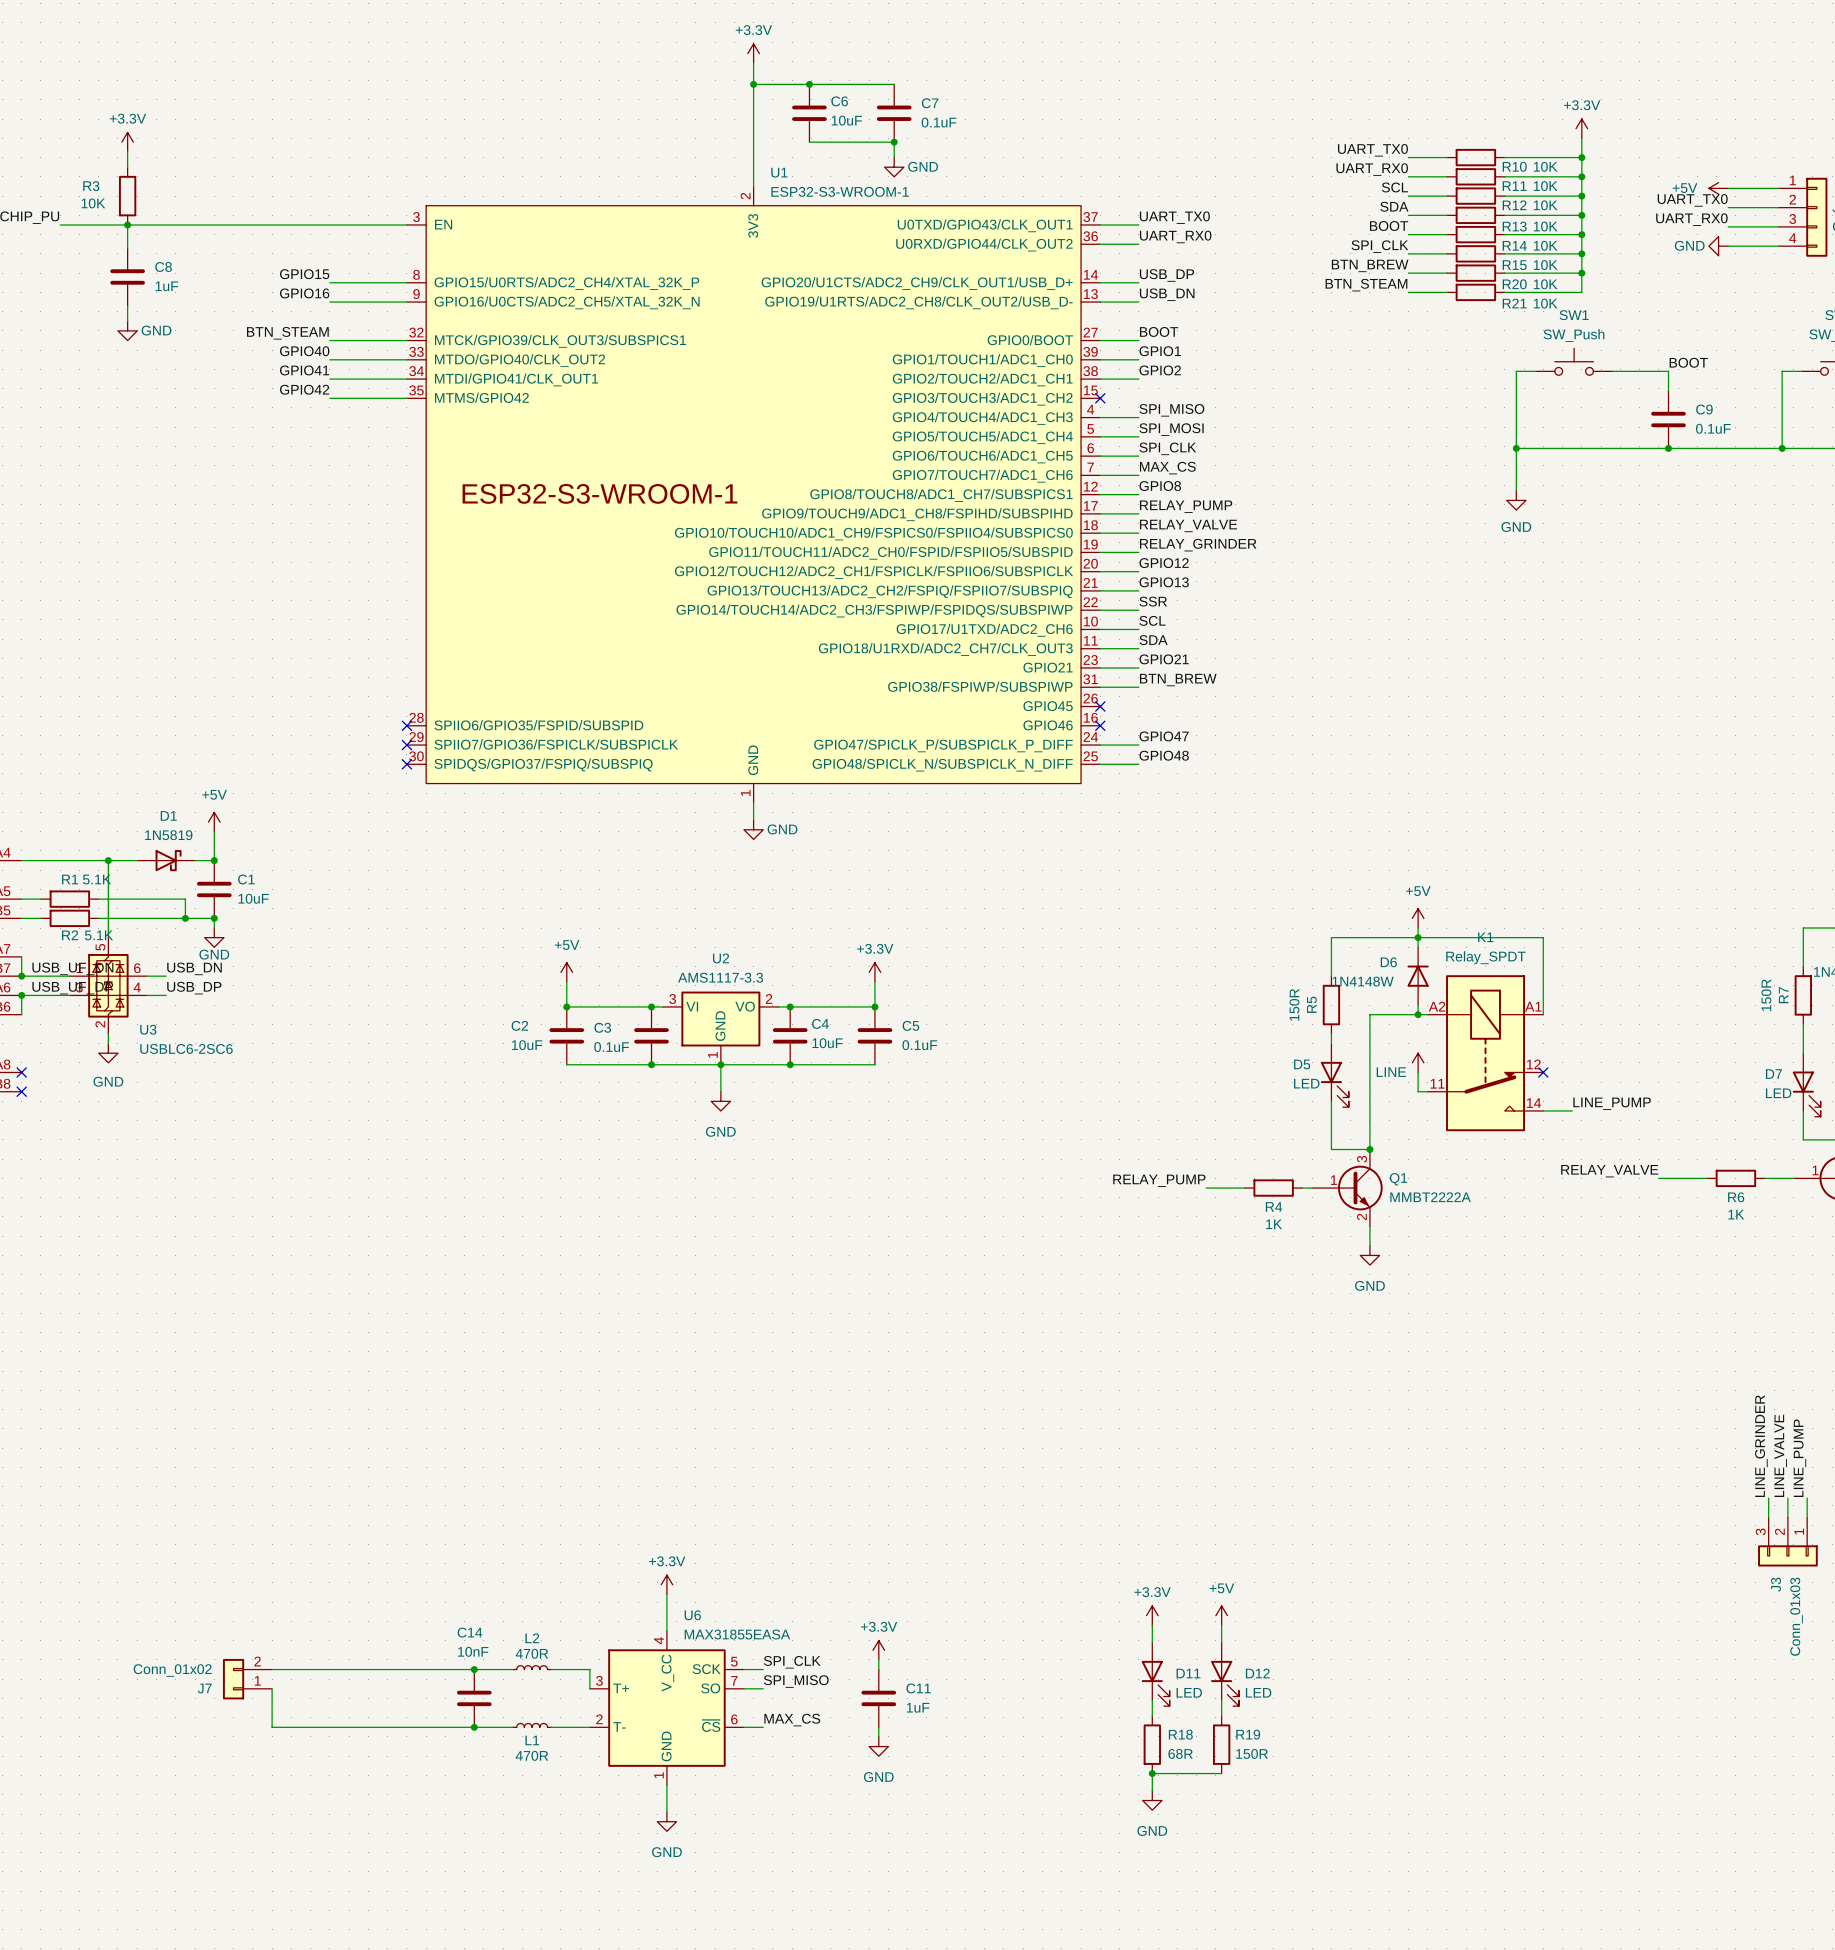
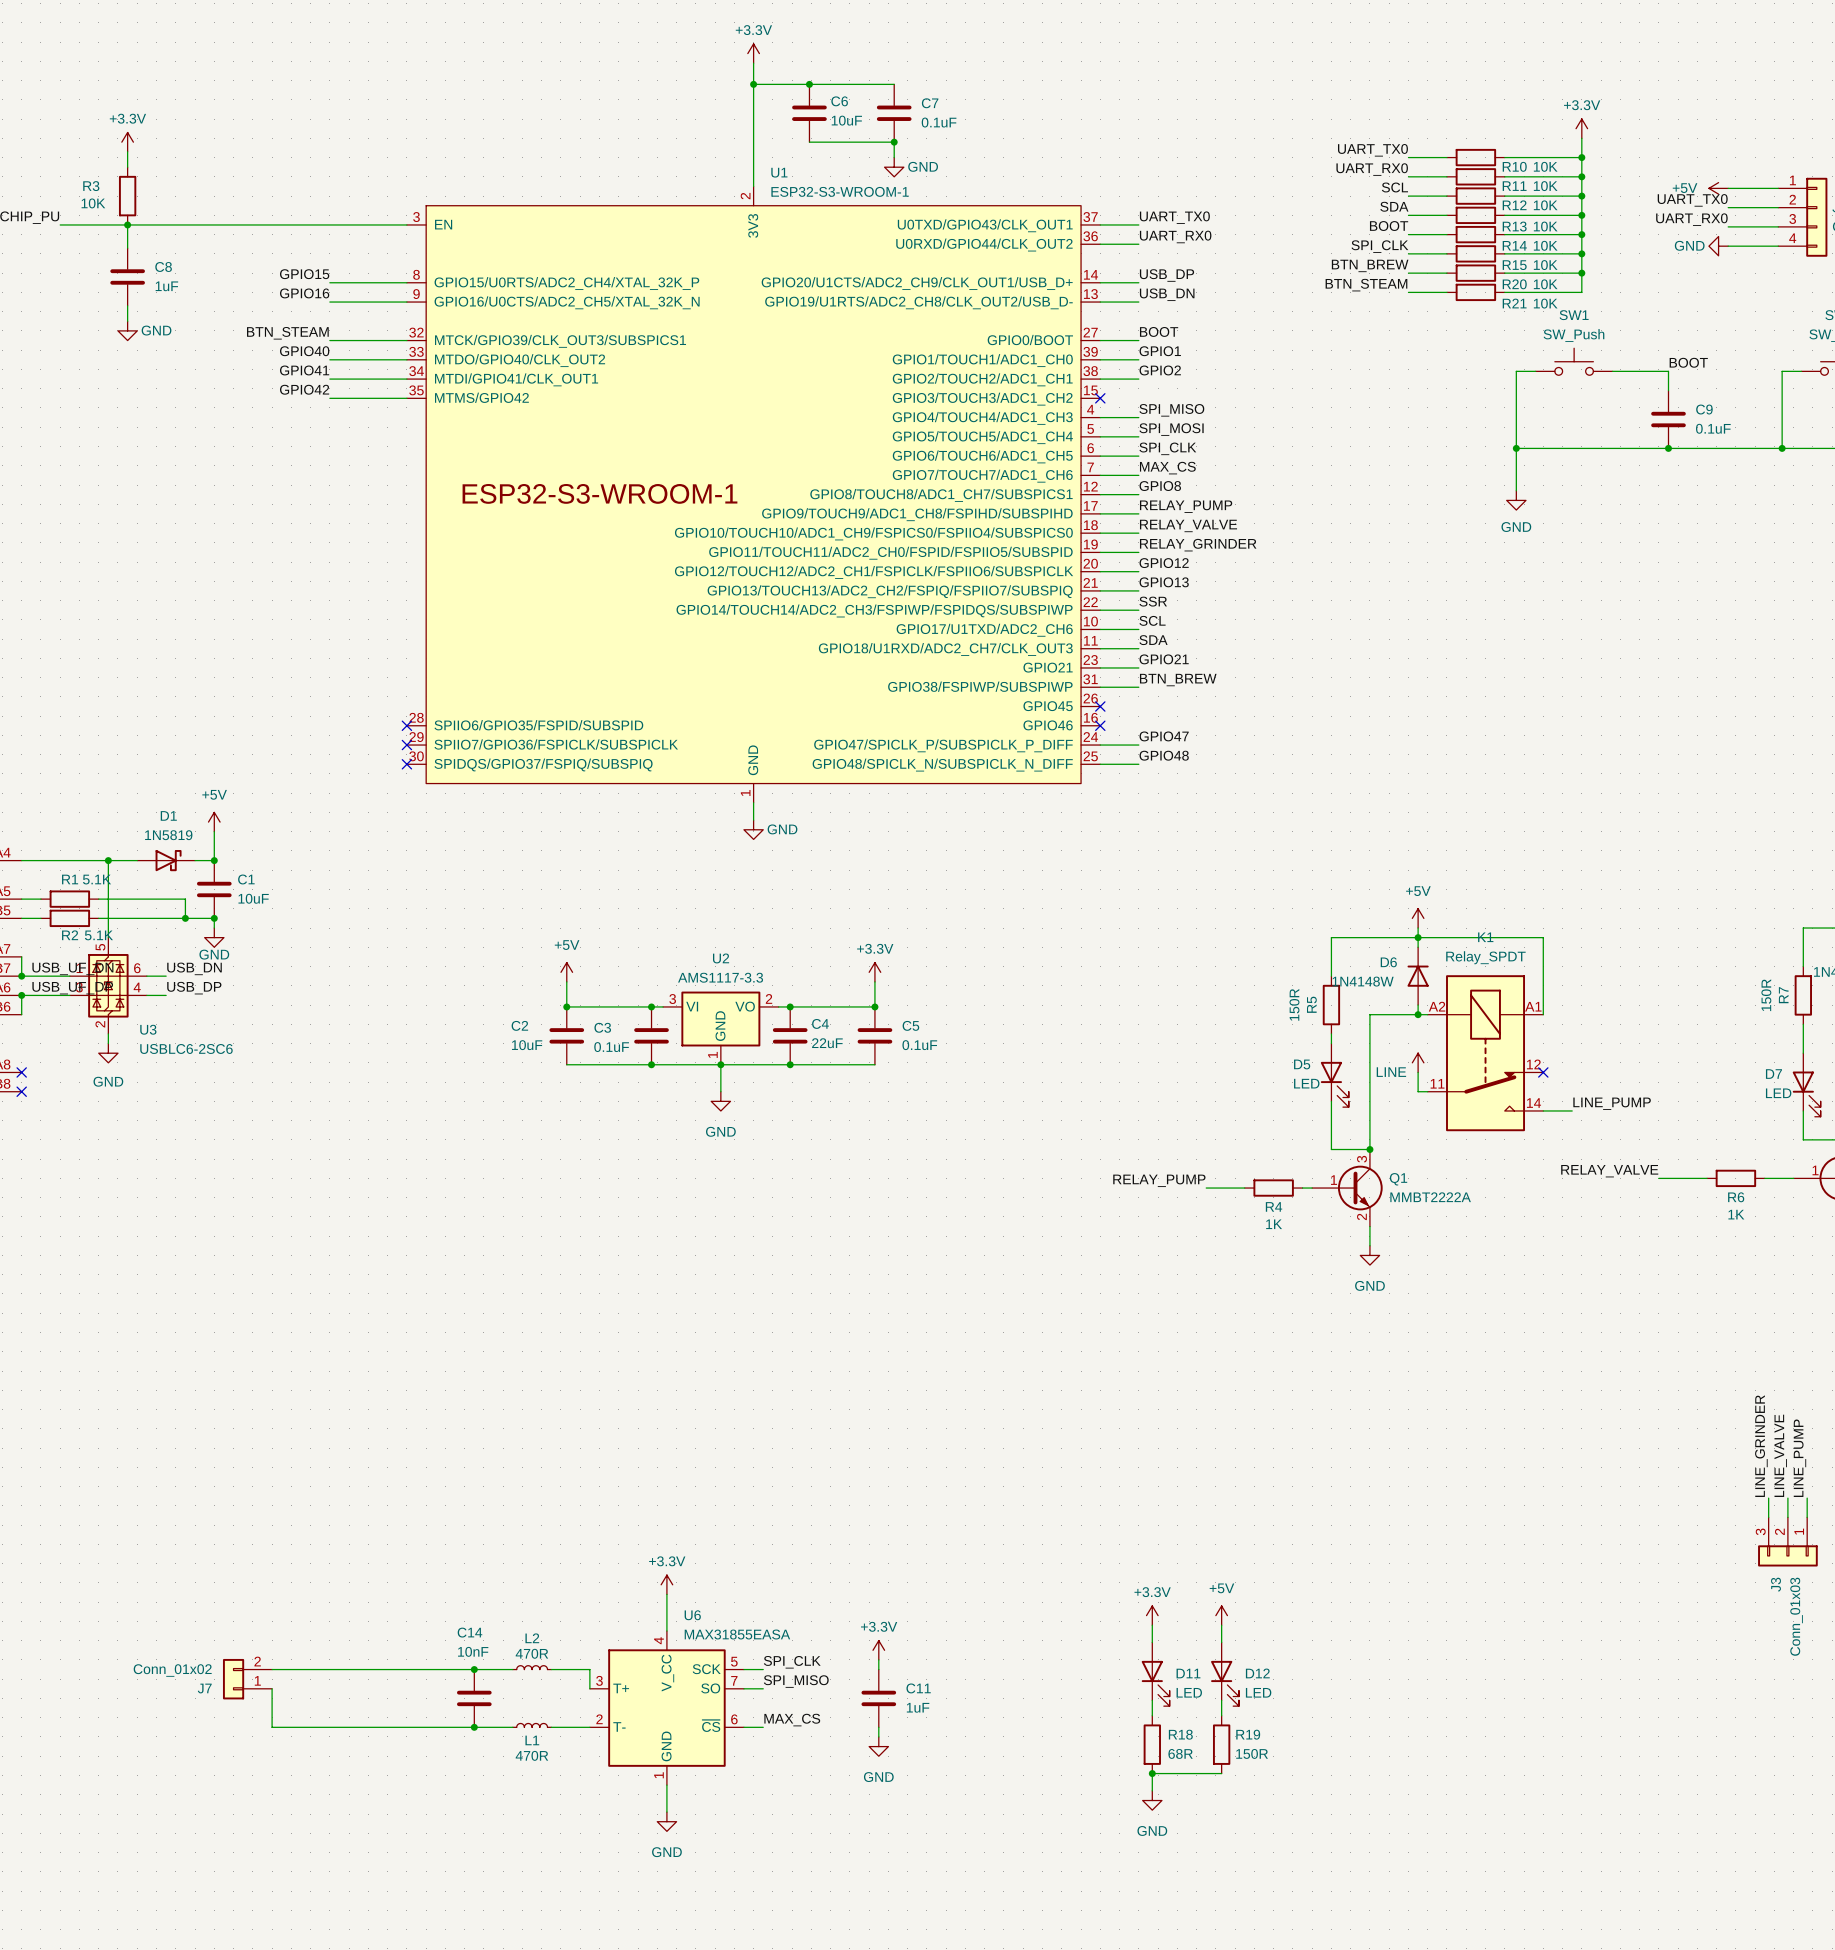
C4 value: 10uF (827, 1043) -> 22uF (827, 1043)

